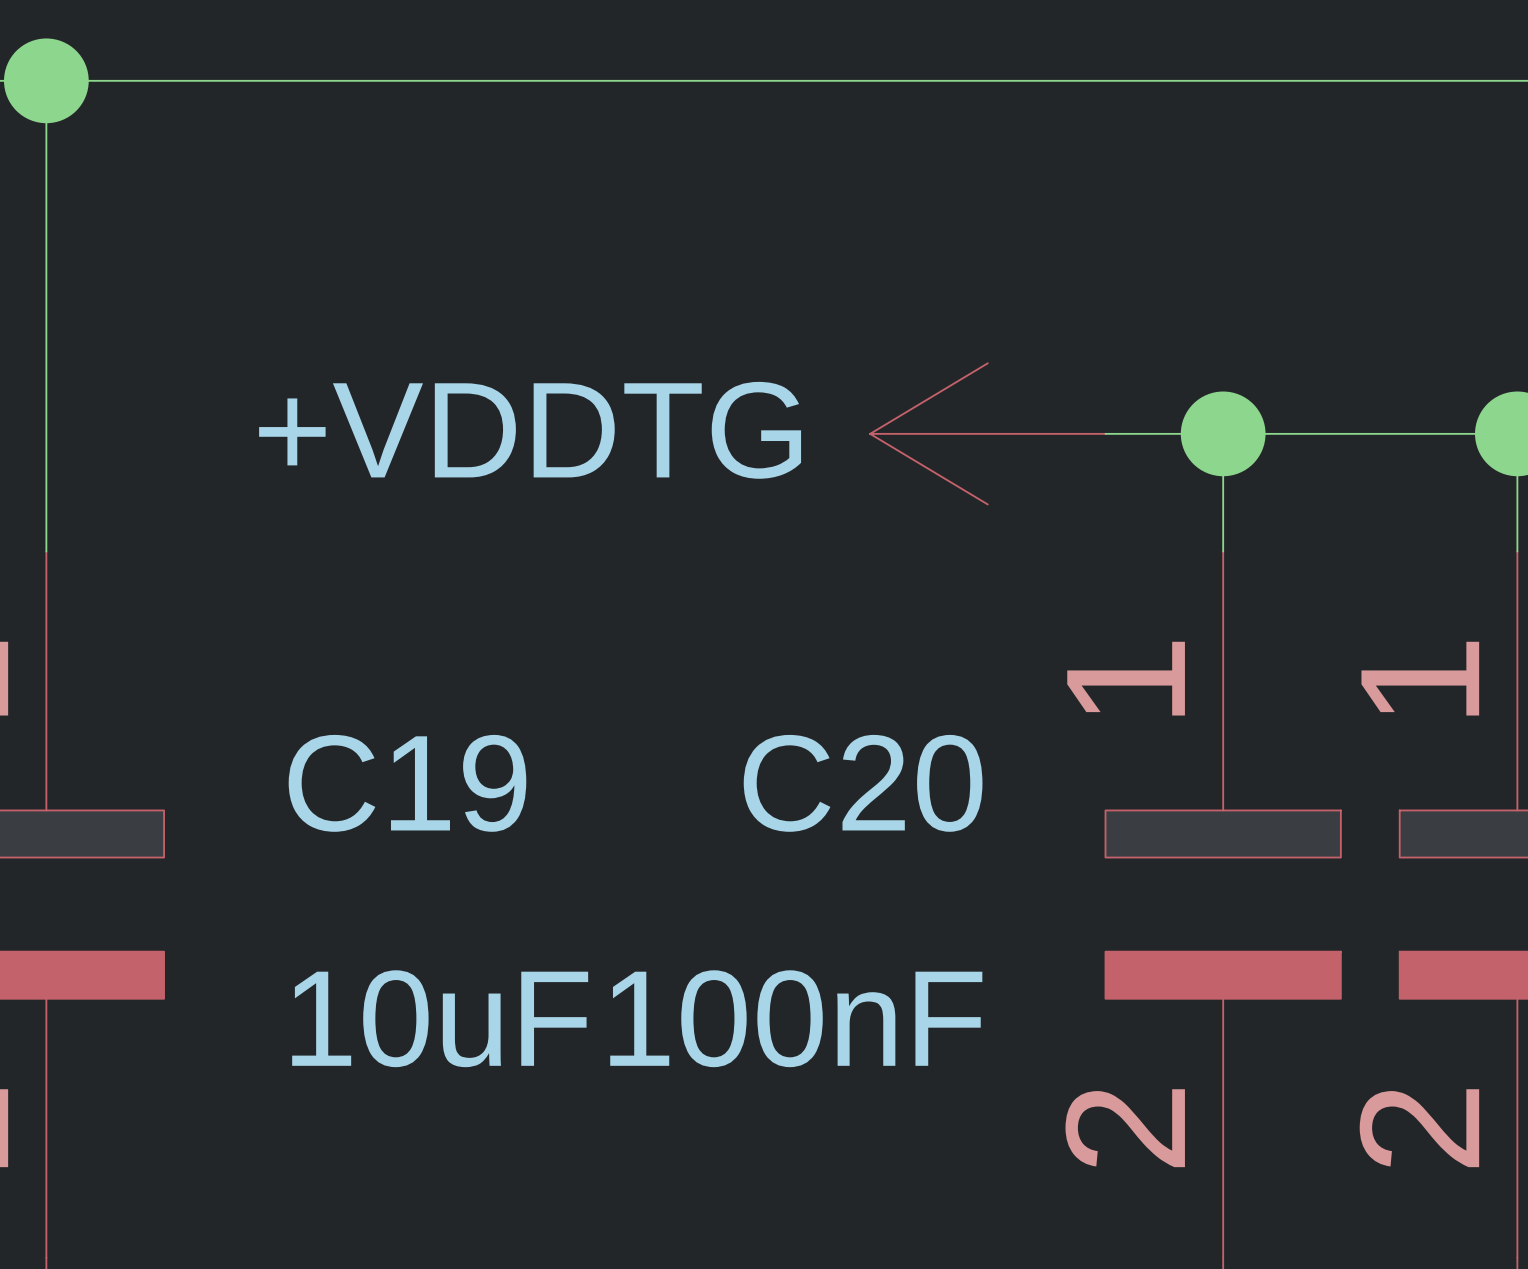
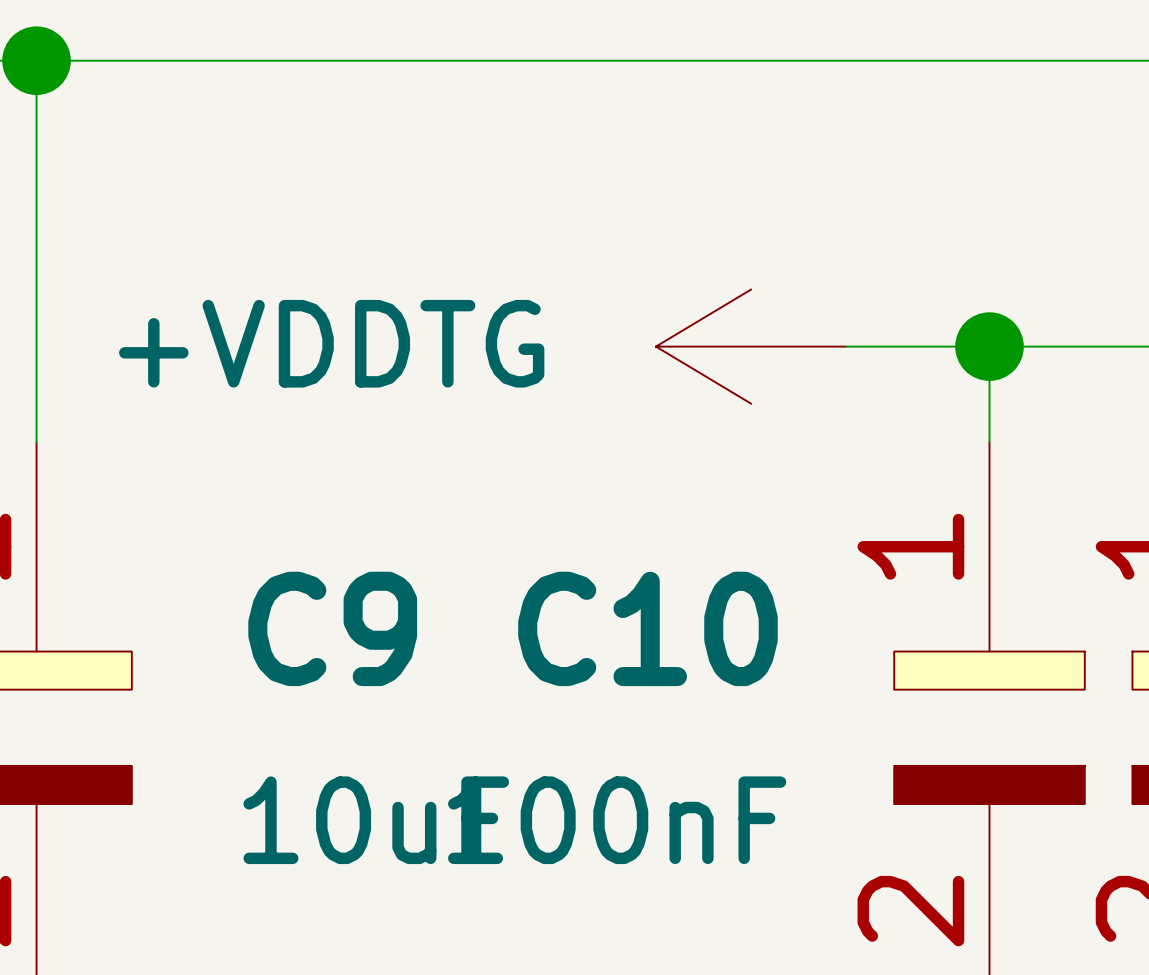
power symbol text position: +VDDTG (530, 430) -> +VDDTG (331, 343)
power symbol position: +VDDTG (987, 433) -> +VDDTG (751, 346)
C19 name: C19 (407, 783) -> C9 (332, 628)
C20 name: C20 (863, 783) -> C10 (647, 628)

